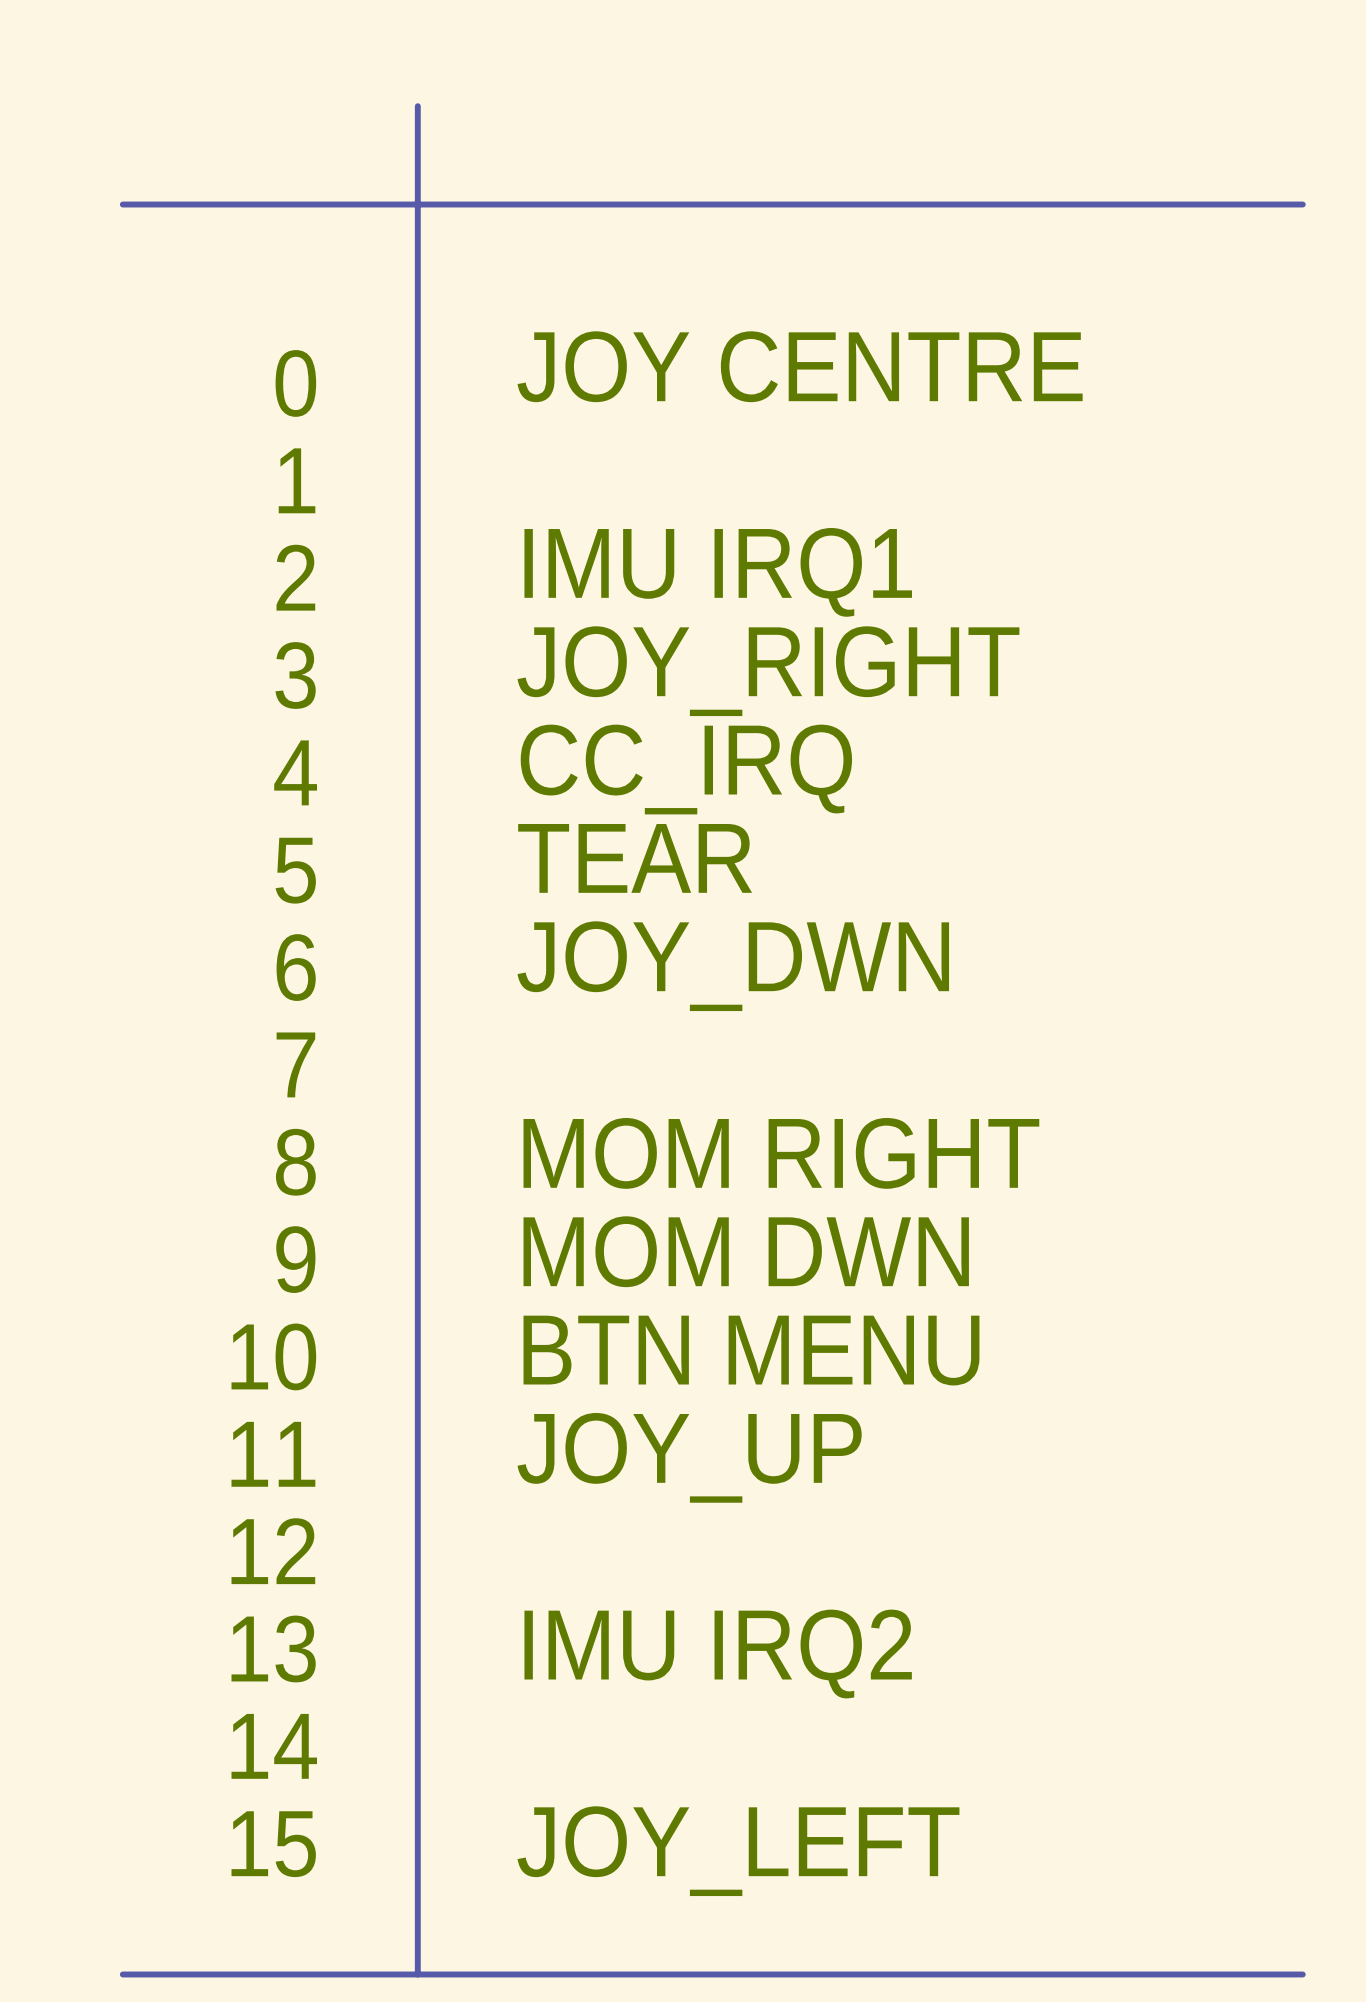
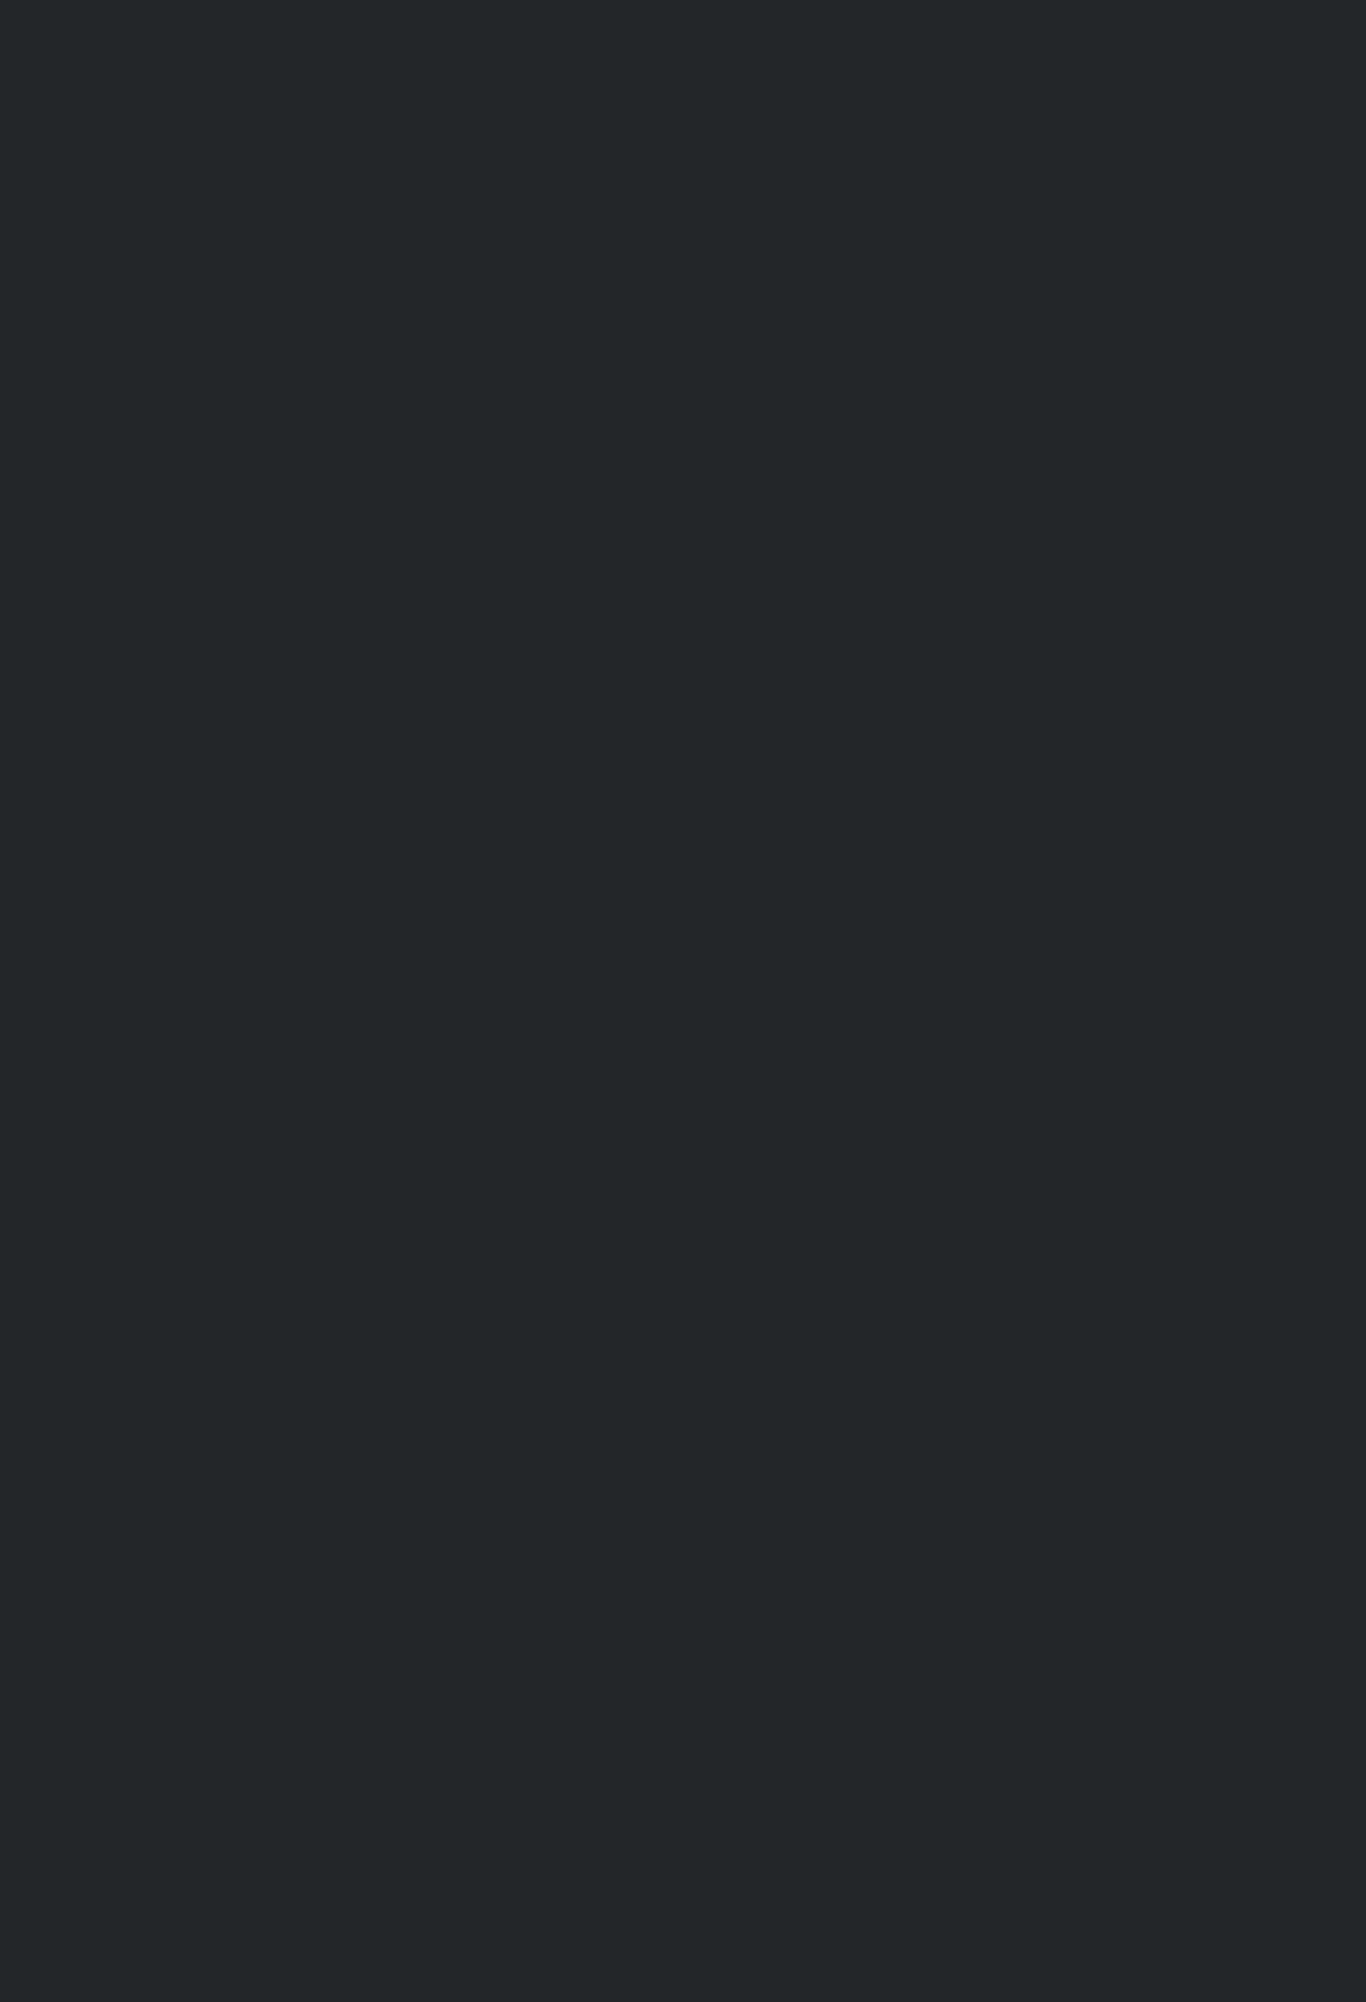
line: (417, 106) (417, 1974) -> none
line: (122, 204) (1302, 204) -> none
text: JOY CENTRE (800, 366) -> none
text: 0 (295, 383) -> none
text: 1 (297, 480) -> none
text: IMU IRQ1 (718, 572) -> none
text: 2 (295, 577) -> none
text: JOY_RIGHT (768, 671) -> none
text: 3 (295, 675) -> none
text: CC_IRQ (686, 769) -> none
text: 4 (295, 772) -> none
text: TEAR (635, 858) -> none
text: 5 (295, 870) -> none
text: JOY_DWN (733, 966) -> none
text: 6 (296, 967) -> none
text: 7 (295, 1064) -> none
text: MOM RIGHT (781, 1153) -> none
text: 8 (295, 1162) -> none
text: MOM DWN (746, 1251) -> none
text: 9 (295, 1259) -> none
text: BTN MENU (751, 1350) -> none
text: 10 (273, 1356) -> none
text: 11 (273, 1454) -> none
text: JOY_UP (689, 1457) -> none
text: 12 (273, 1551) -> none
text: 13 (273, 1648) -> none
text: IMU IRQ2 (718, 1654) -> none
text: 14 (274, 1746) -> none
text: 15 (273, 1844) -> none
text: JOY_LEFT (738, 1851) -> none
line: (122, 1974) (1302, 1974) -> none

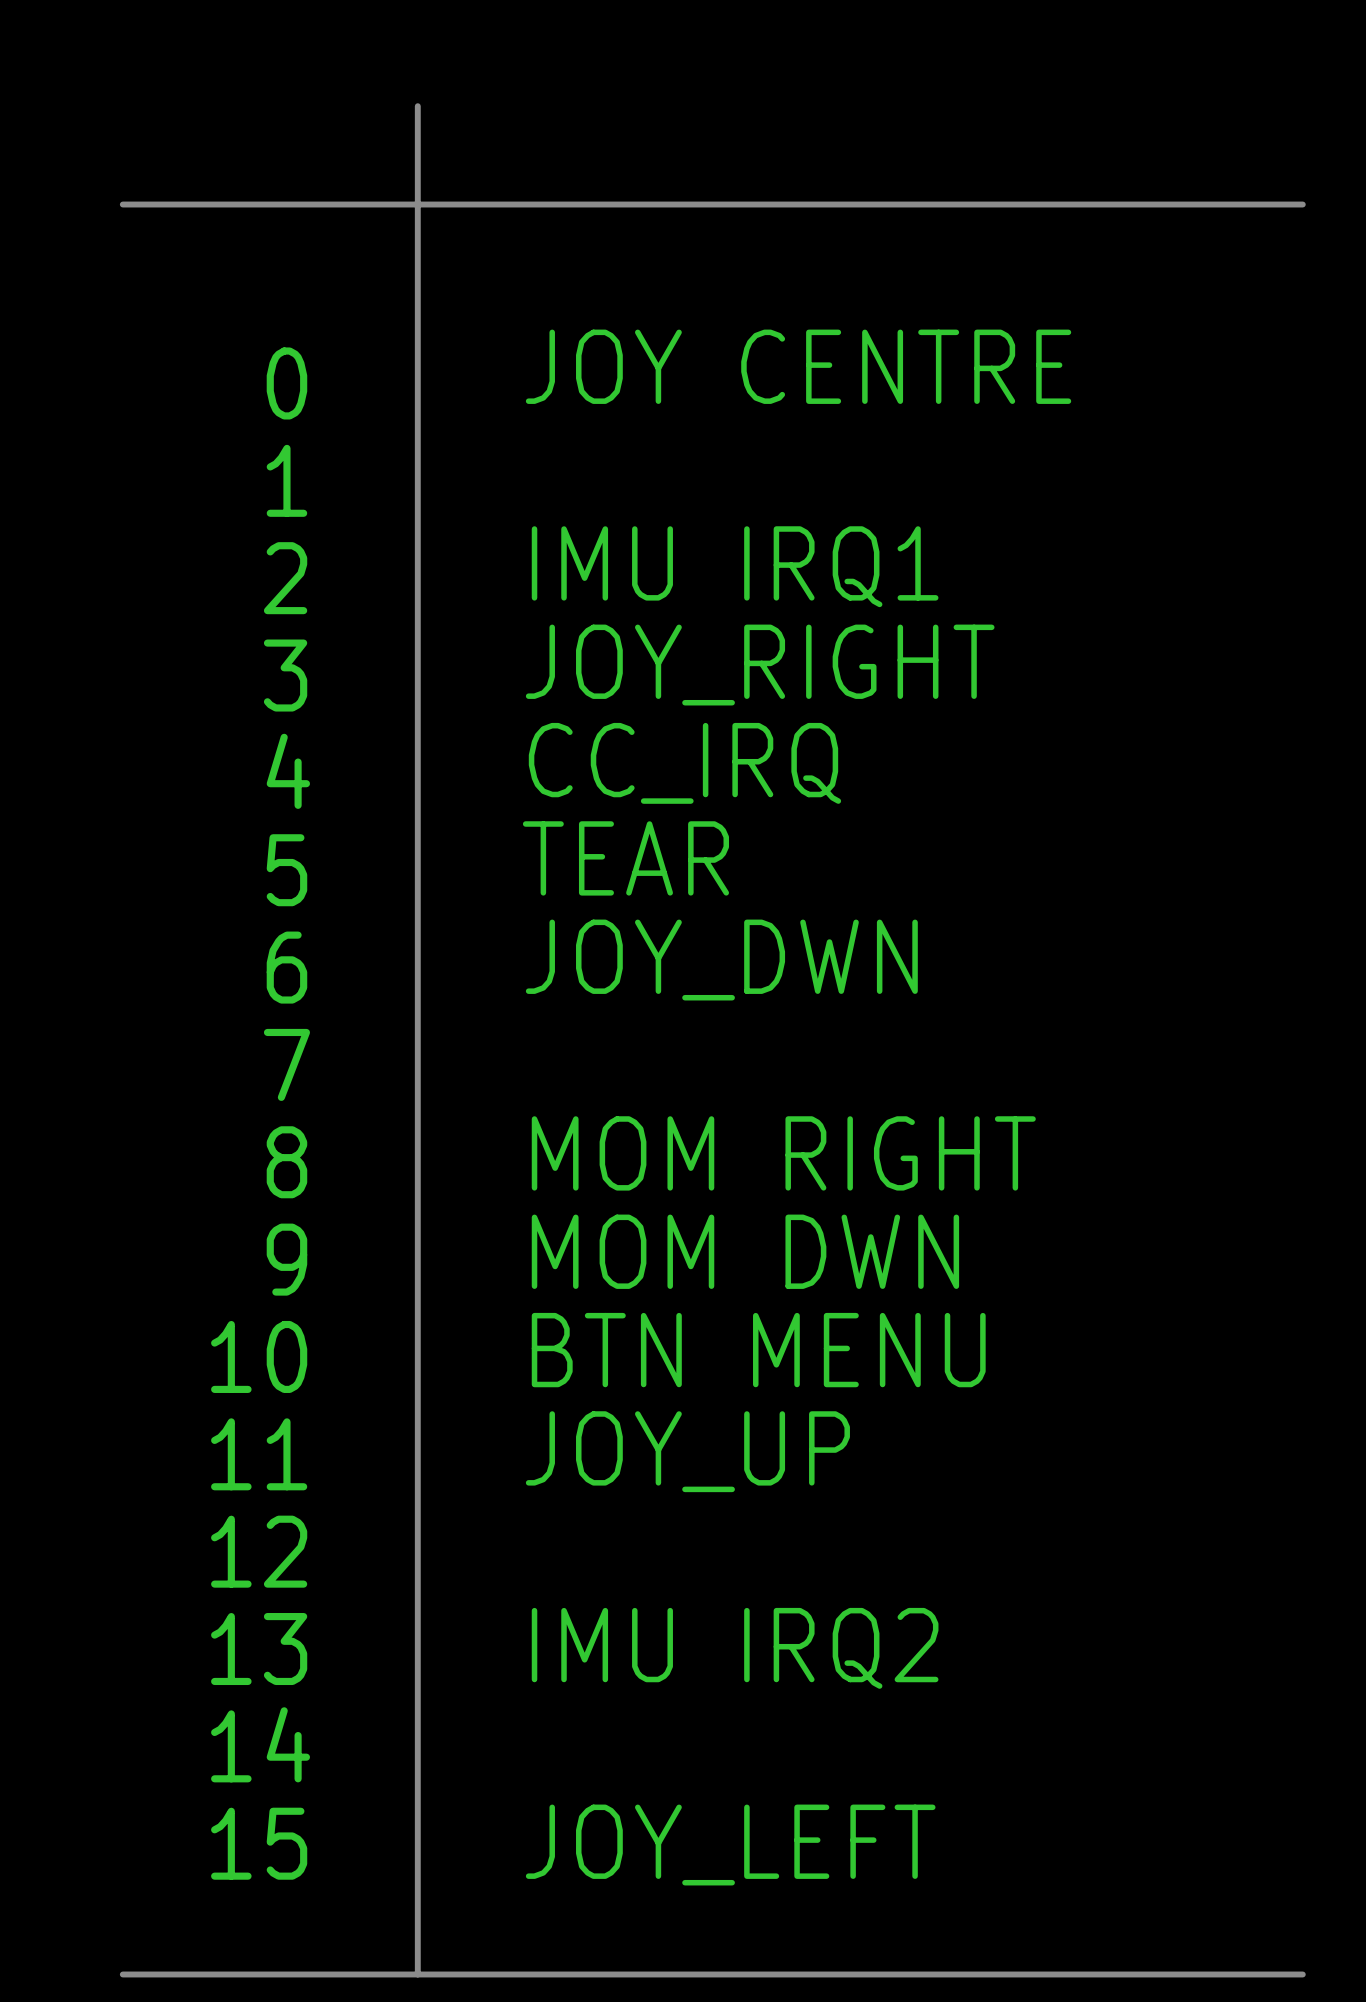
line: none -> (417, 106) (417, 1974)
line: none -> (122, 204) (1302, 204)
text: none -> JOY CENTRE (798, 366)
text: none -> 0 (286, 383)
text: none -> 1 (286, 480)
text: none -> IMU IRQ1 (735, 566)
text: none -> 2 (285, 578)
text: none -> JOY_RIGHT (760, 665)
text: none -> 3 (285, 675)
text: none -> CC_IRQ (684, 763)
text: none -> 4 (288, 771)
text: none -> TEAR (625, 858)
text: none -> 5 (286, 870)
text: none -> JOY_DWN (721, 960)
text: none -> 6 (286, 967)
text: none -> 7 (286, 1064)
text: none -> MOM RIGHT (783, 1153)
text: none -> 8 (286, 1162)
text: none -> MOM DWN (745, 1251)
text: none -> 9 (286, 1259)
text: none -> BTN MENU (758, 1350)
text: none -> 10 (259, 1356)
text: none -> JOY_UP (687, 1451)
text: none -> 11 (259, 1454)
text: none -> 12 (259, 1551)
text: none -> IMU IRQ2 (735, 1648)
text: none -> 13 (259, 1649)
text: none -> 14 (260, 1744)
text: none -> 15 (259, 1843)
text: none -> JOY_LEFT (730, 1845)
line: none -> (122, 1974) (1302, 1974)

